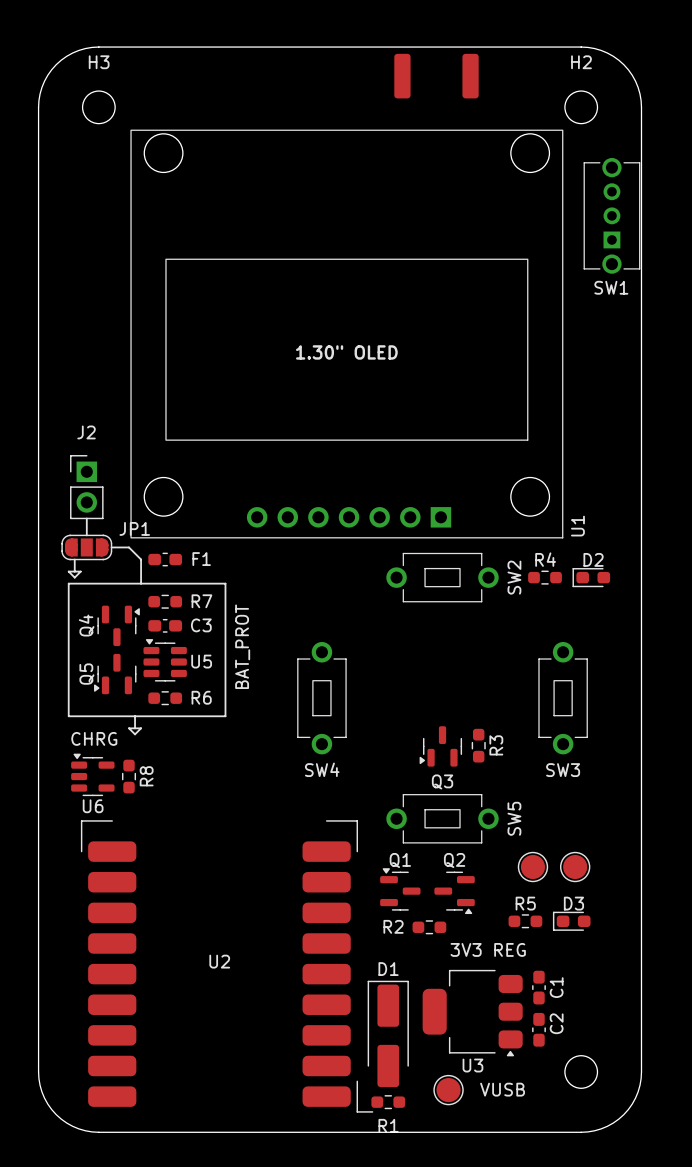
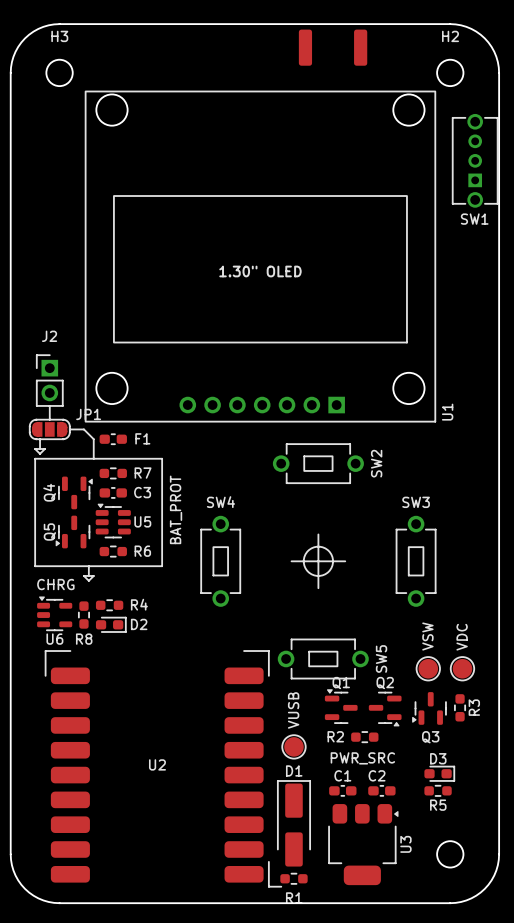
R4 name position: R4 (545, 559) -> R4 (139, 604)
D2 name position: D2 (593, 559) -> D2 (139, 624)
SW2 position: (442, 577) -> (318, 463)
R4 position: (545, 577) -> (109, 605)
D2 rotation: 0° (591, 577) -> 180° (111, 624)
D2 position: (591, 577) -> (111, 624)
line: none -> (318, 534) (318, 588)
drawing: none -> [303, 545, 334, 577]
SW4 position: (321, 698) -> (220, 561)
SW3 position: (563, 698) -> (416, 561)
line: none -> (291, 561) (345, 561)
R3 position: (478, 745) -> (460, 707)
Q3 position: (440, 746) -> (429, 708)
SW4 name position: SW4 (322, 769) -> SW4 (220, 502)
SW3 name position: SW3 (563, 770) -> SW3 (416, 502)
R8 name rotation: 0° (146, 776) -> 90° clockwise (84, 639)
R8 name position: R8 (146, 776) -> R8 (84, 639)
text: none -> VSW (427, 636)
text: none -> VDC (462, 637)
SW5 position: (442, 818) -> (323, 658)
part: none -> (428, 668)
part: none -> (462, 668)
part: (532, 867) -> none
part: (575, 867) -> none
Q1 position: (400, 889) -> (341, 706)
Q2 position: (454, 892) -> (385, 709)
R5 name position: R5 (525, 903) -> R5 (438, 805)
R5 position: (525, 921) -> (438, 790)
D3 rotation: 0° (571, 921) -> 180° (439, 773)
D3 position: (571, 921) -> (439, 773)
R2 position: (429, 927) -> (364, 737)
part: none -> (293, 746)
text: 3V3 REG (488, 949) -> none
text: none -> PWR_SRC (362, 758)
C1 rotation: 0° (538, 987) -> 90° clockwise (342, 790)
C1 position: (538, 987) -> (342, 790)
C1 name position: C1 (556, 987) -> C1 (342, 775)
U3 rotation: 0° (472, 1013) -> 90° counterclockwise (363, 844)
C2 name position: C2 (556, 1023) -> C2 (377, 775)
C2 rotation: 0° (538, 1029) -> 90° clockwise (381, 790)
C2 position: (538, 1029) -> (381, 790)
text rotation: 0° (502, 1089) -> 90° counterclockwise (293, 710)
text position: VUSB (502, 1089) -> VUSB (293, 710)
part: (448, 1090) -> none

